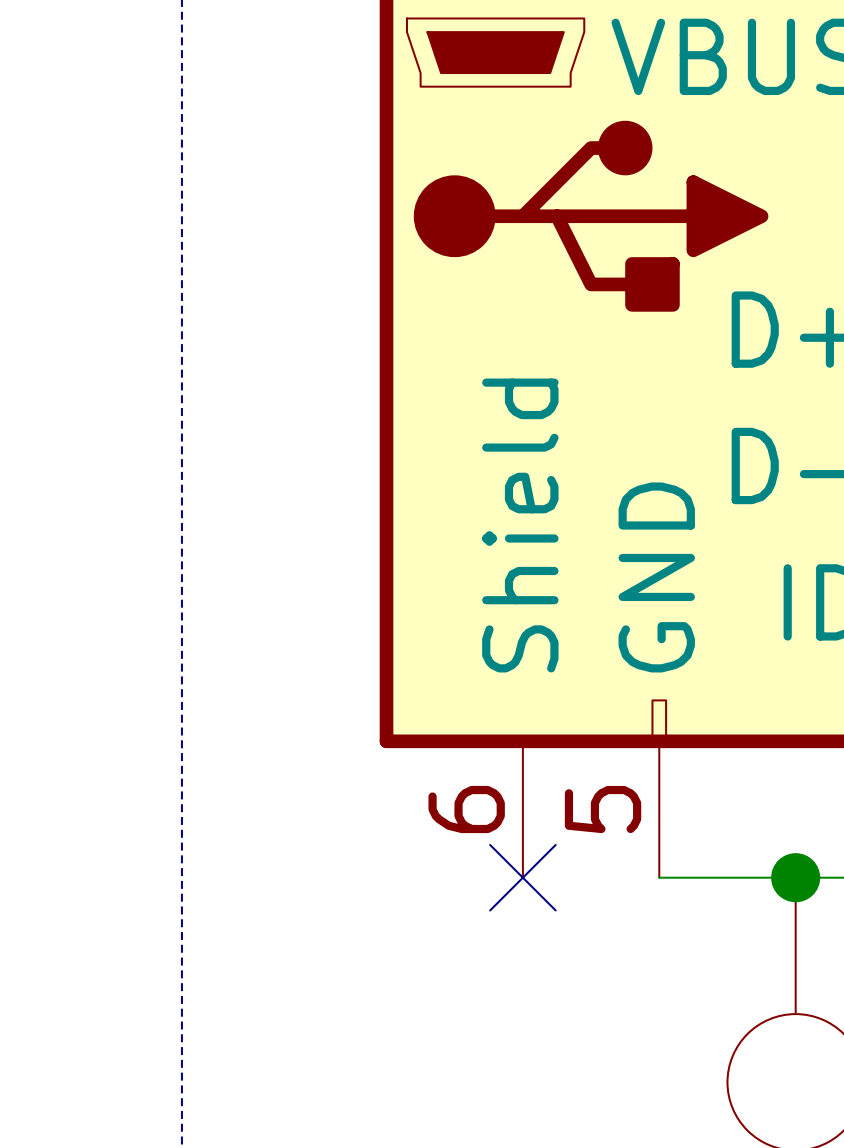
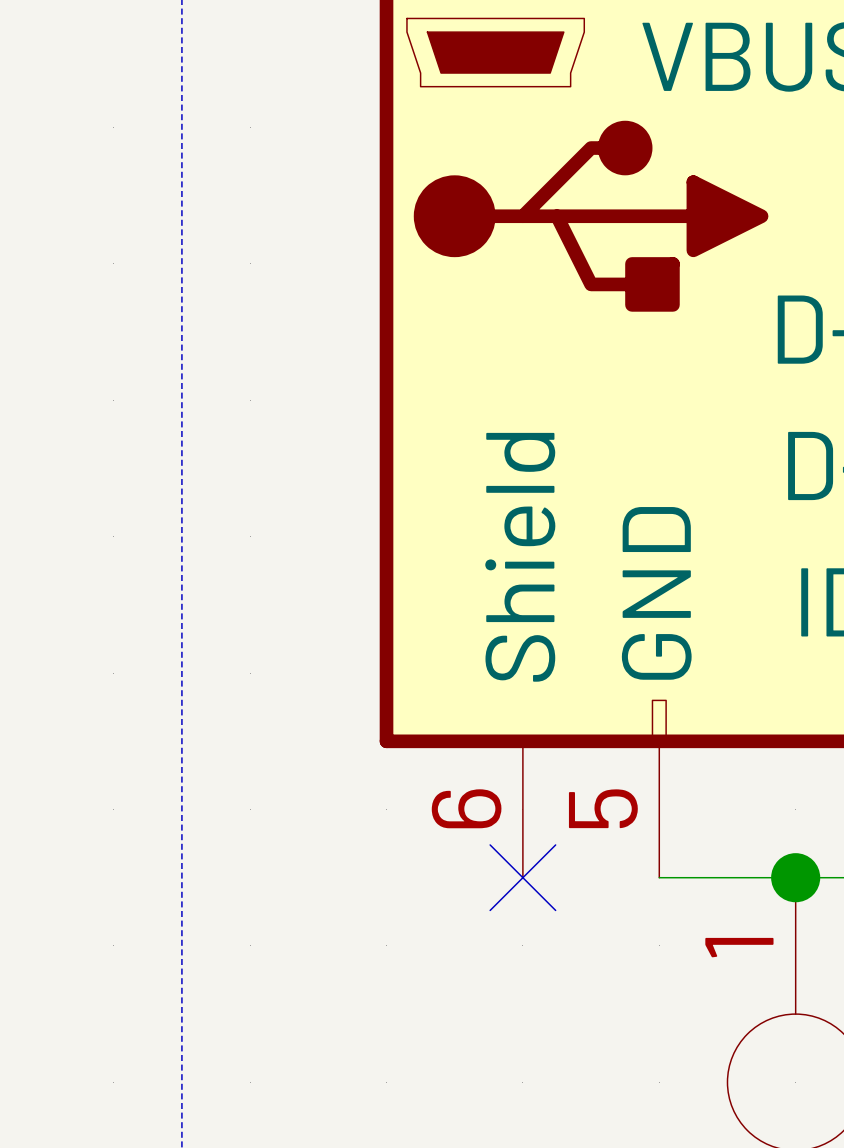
part pin number: none -> 1 (739, 947)

